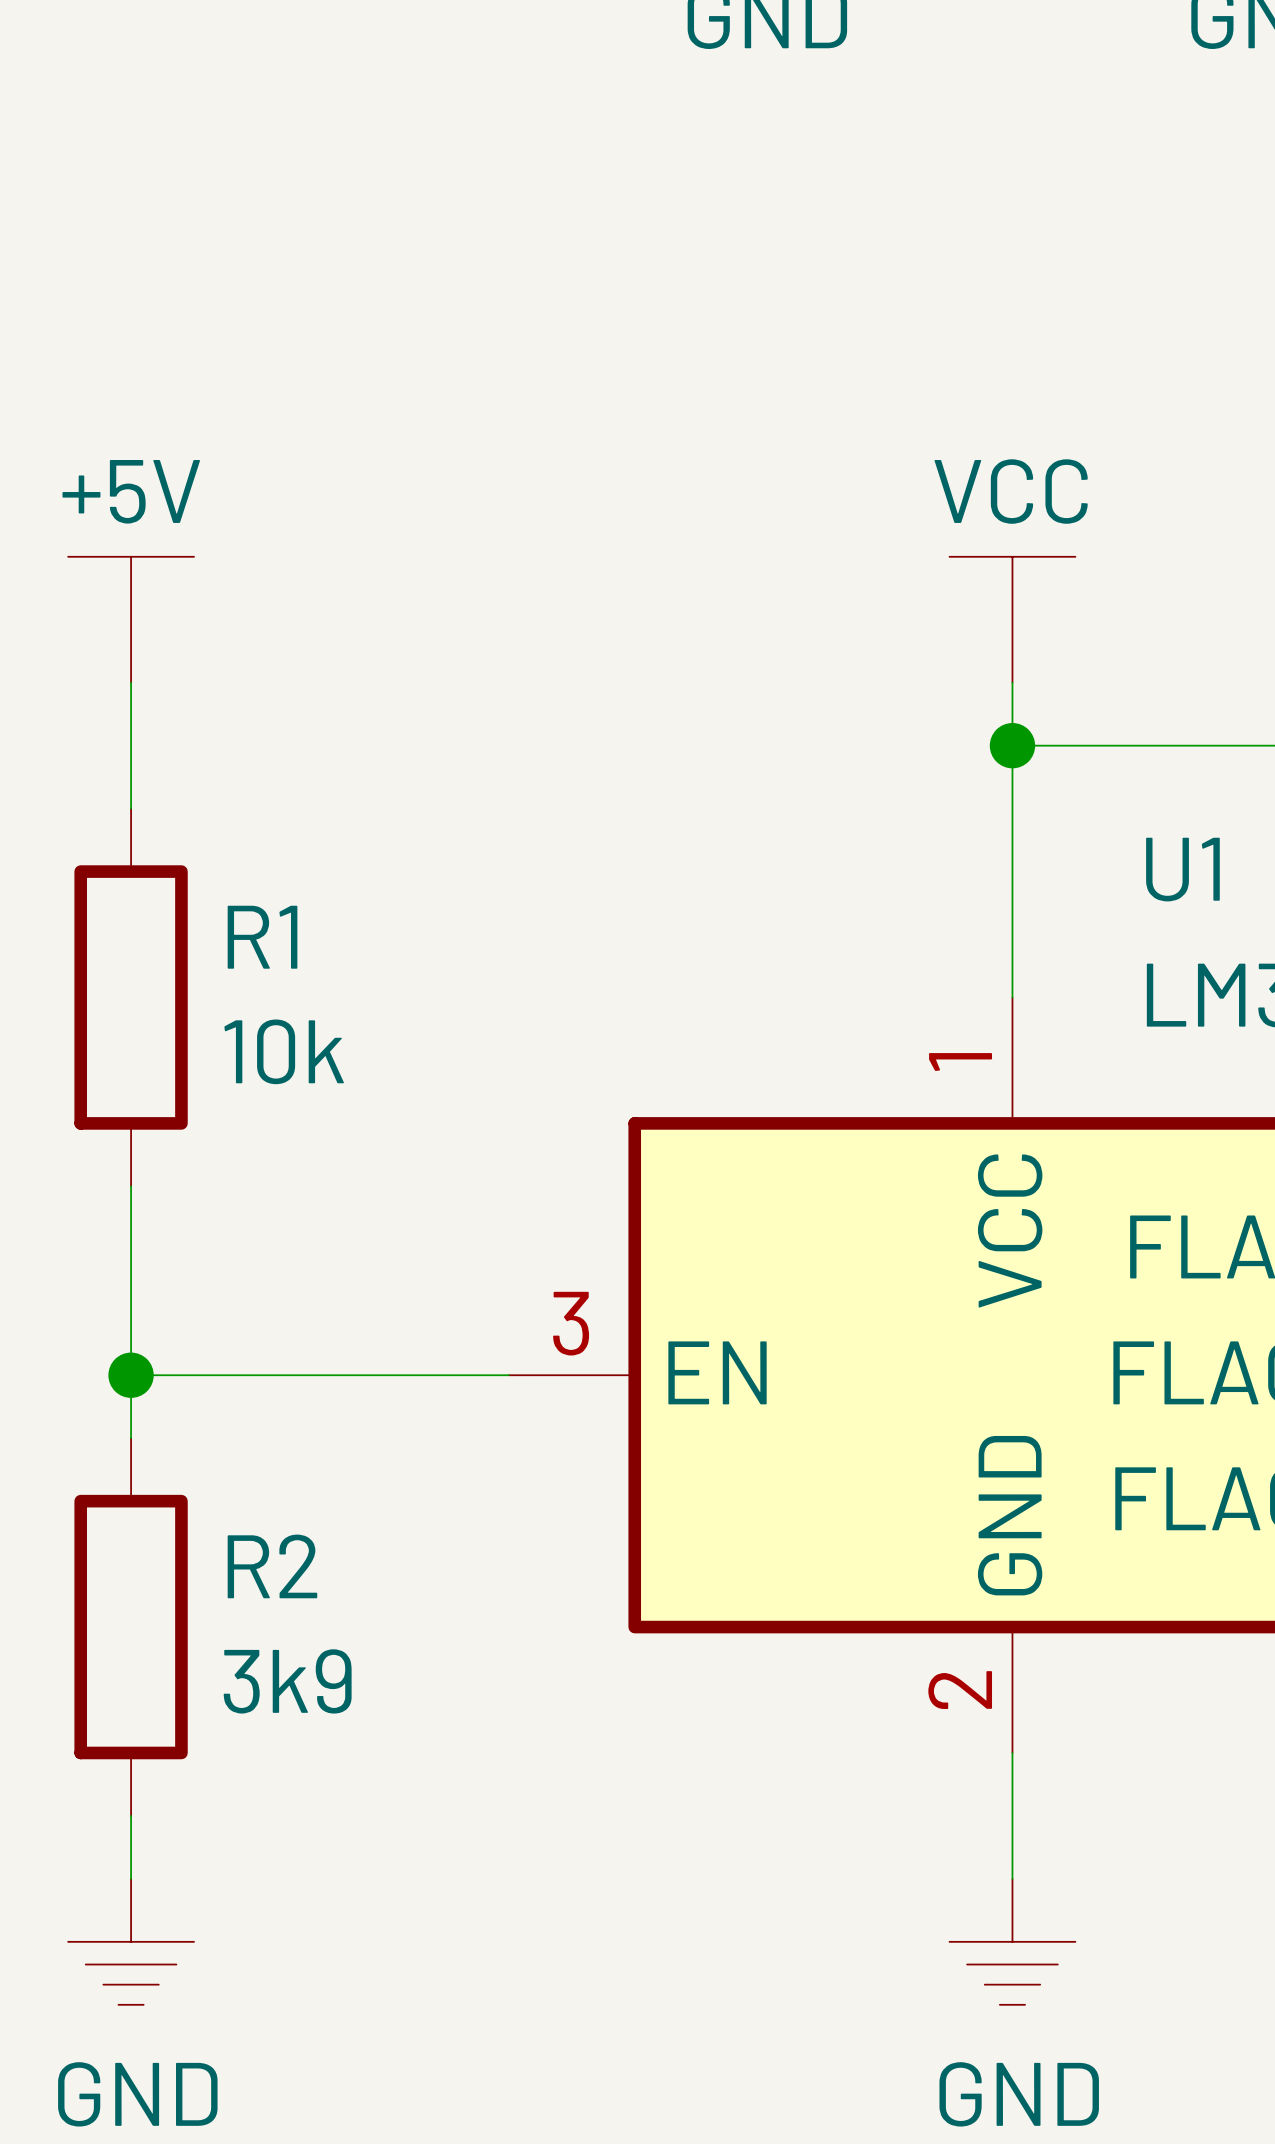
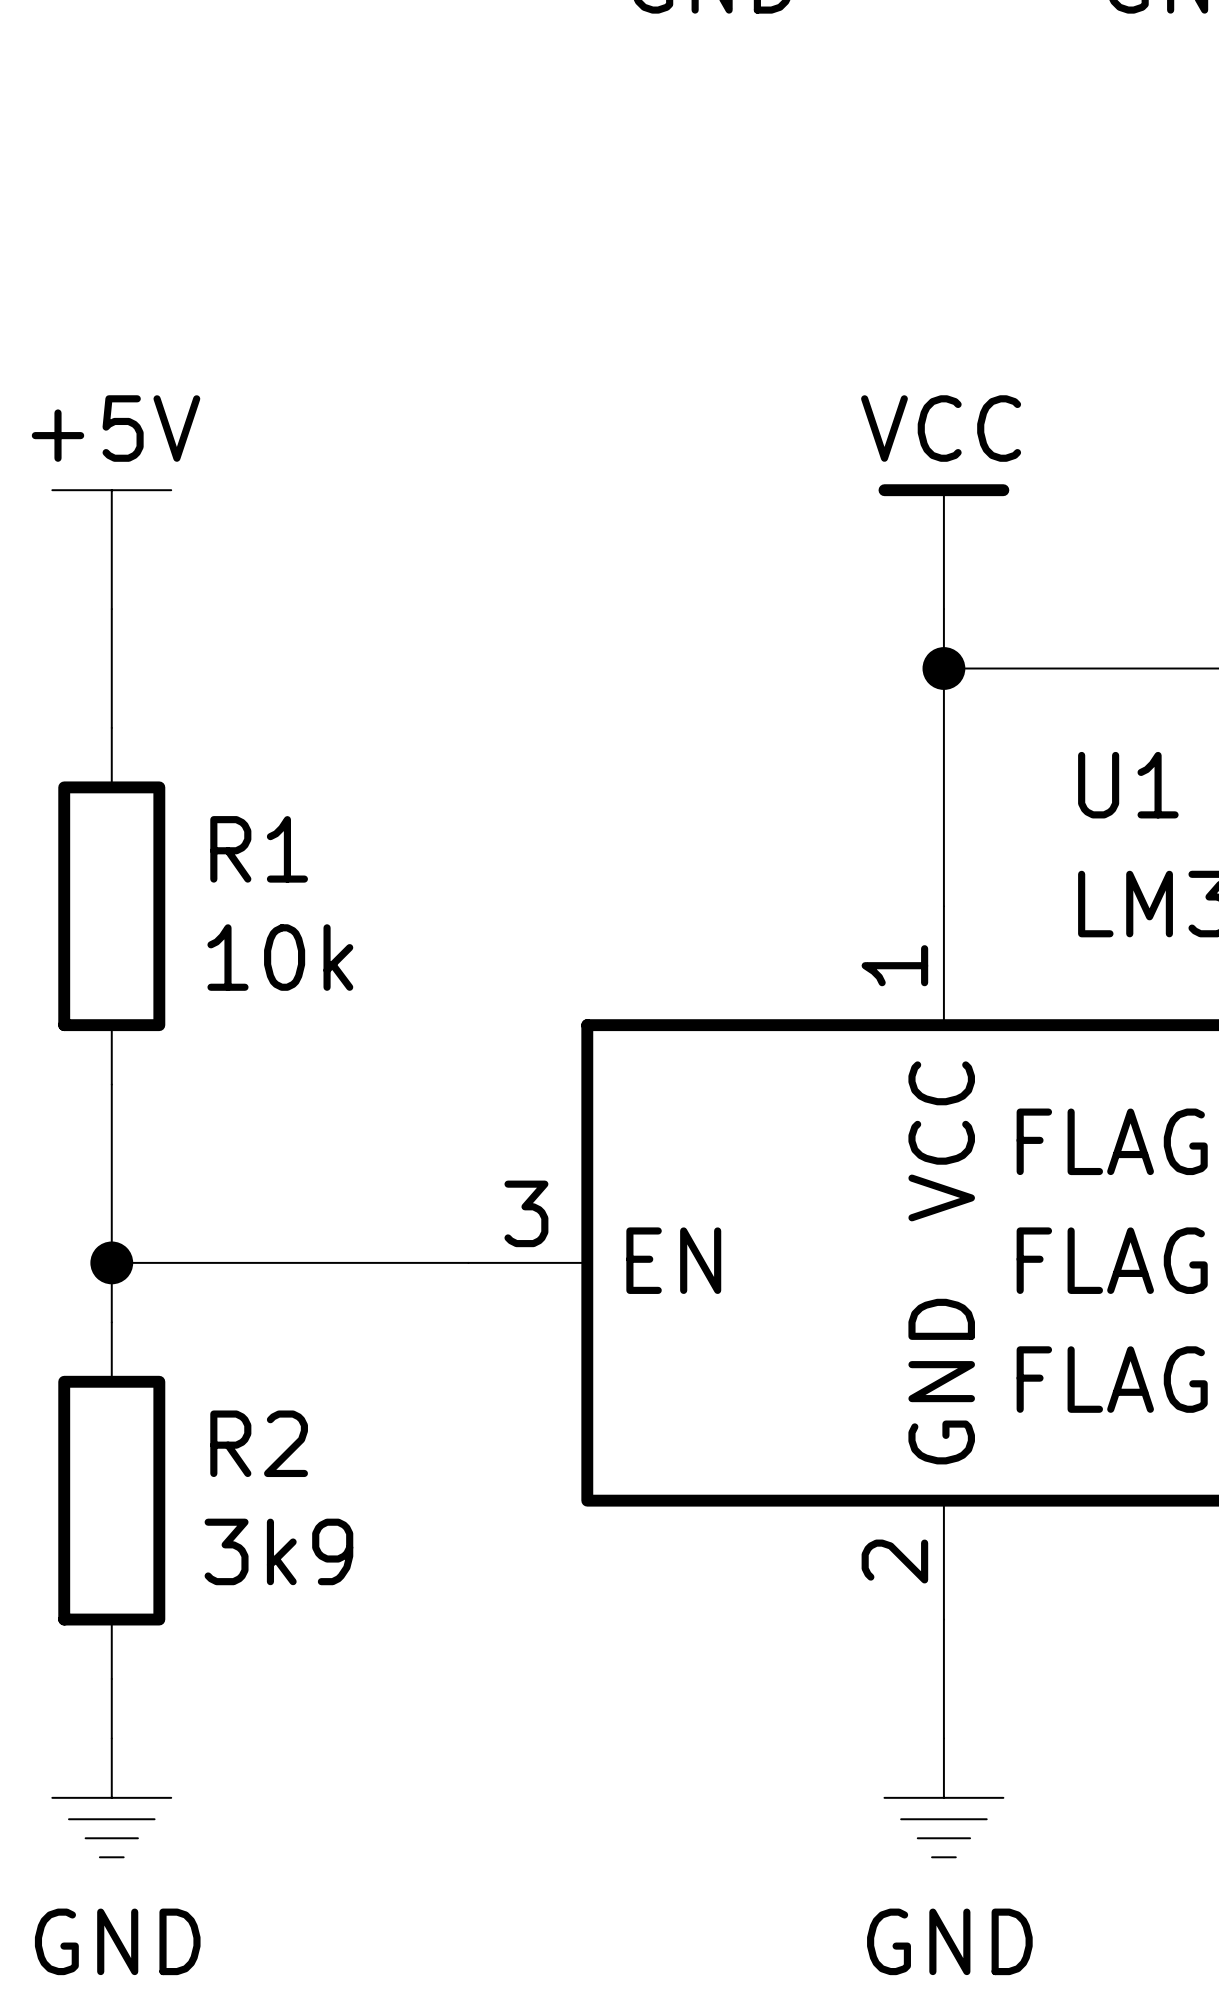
power symbol shape: [949, 556, 1076, 683] -> [878, 484, 1010, 610]

